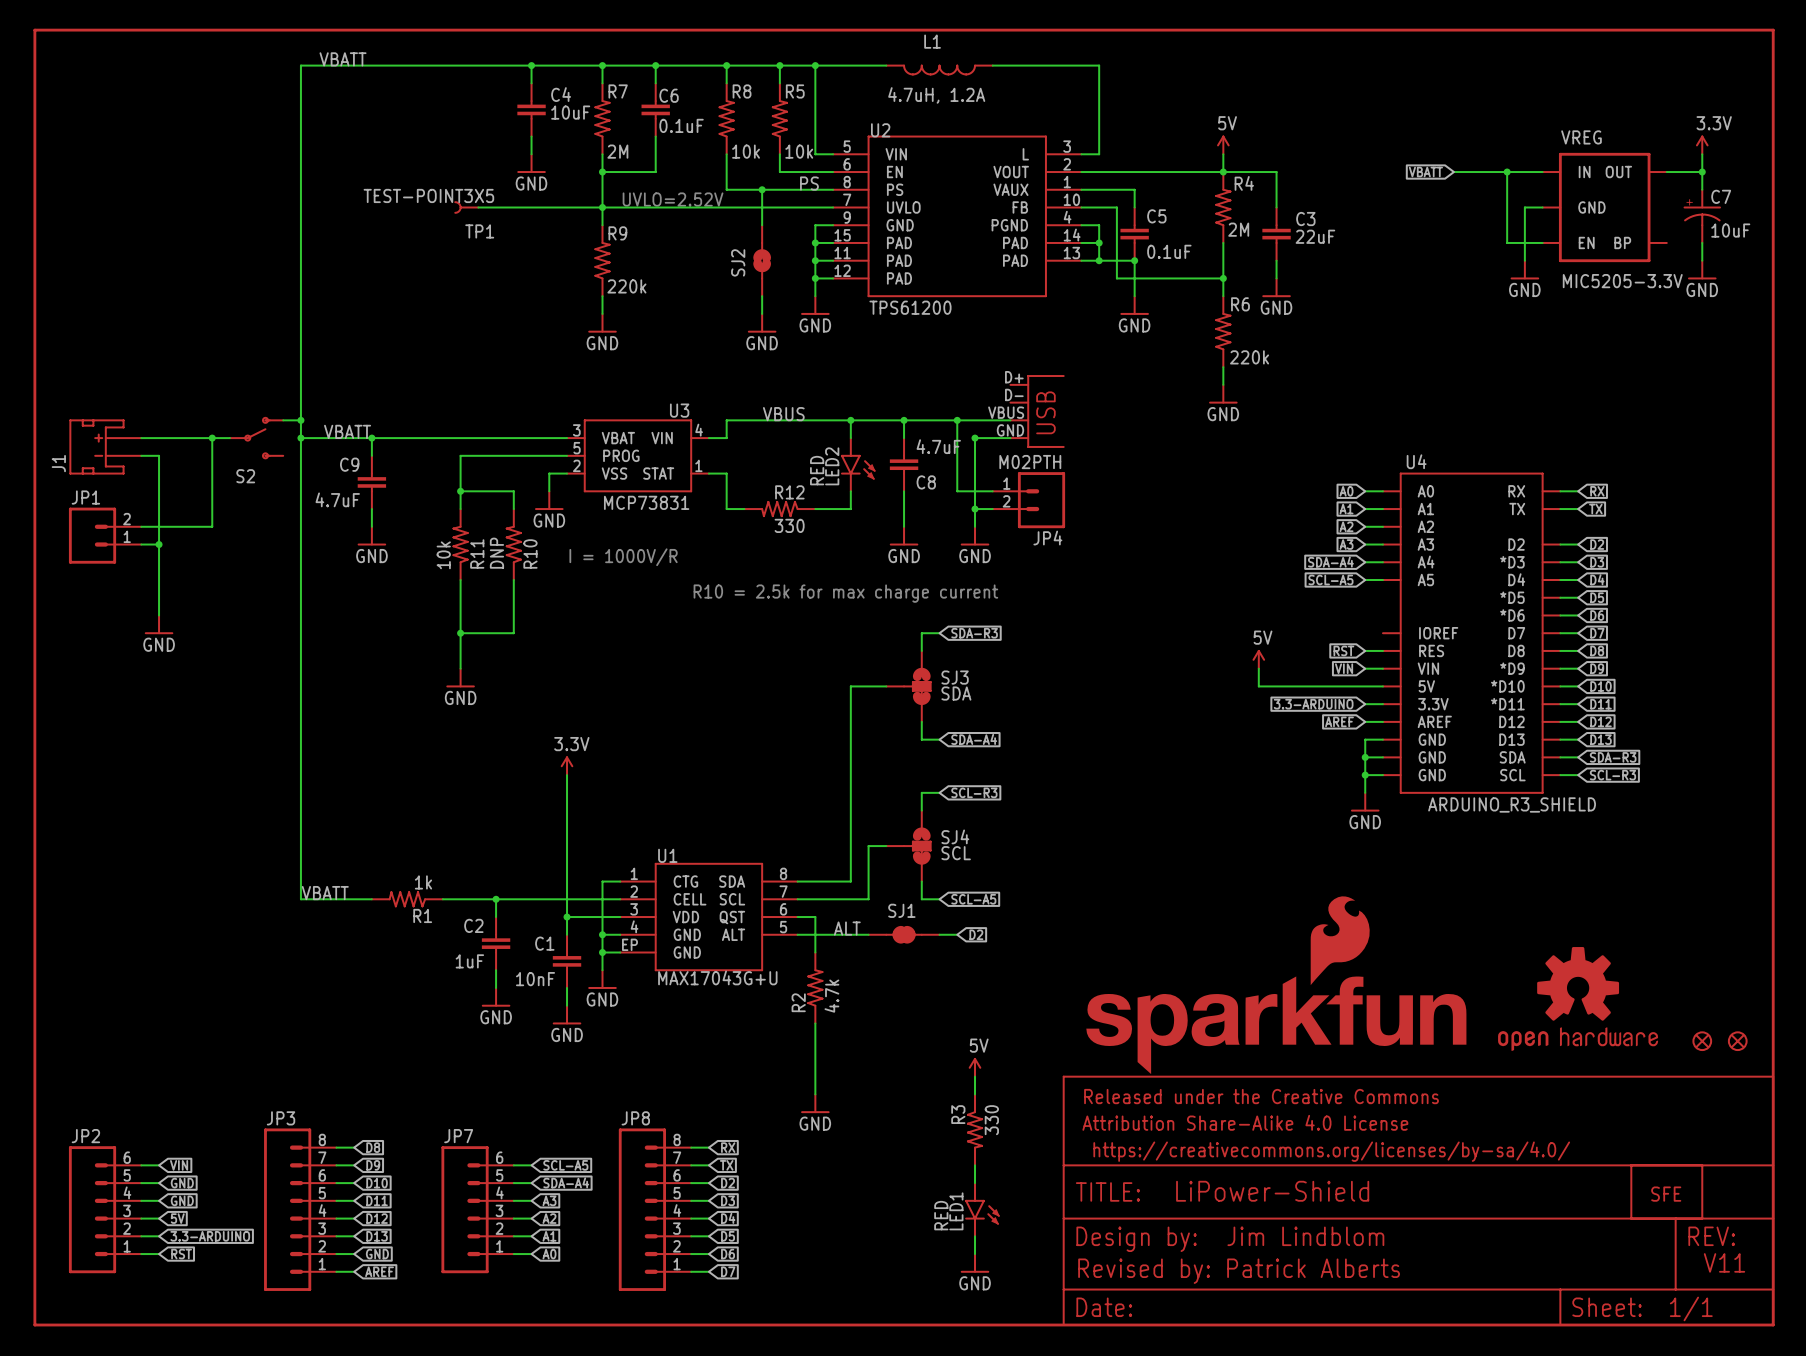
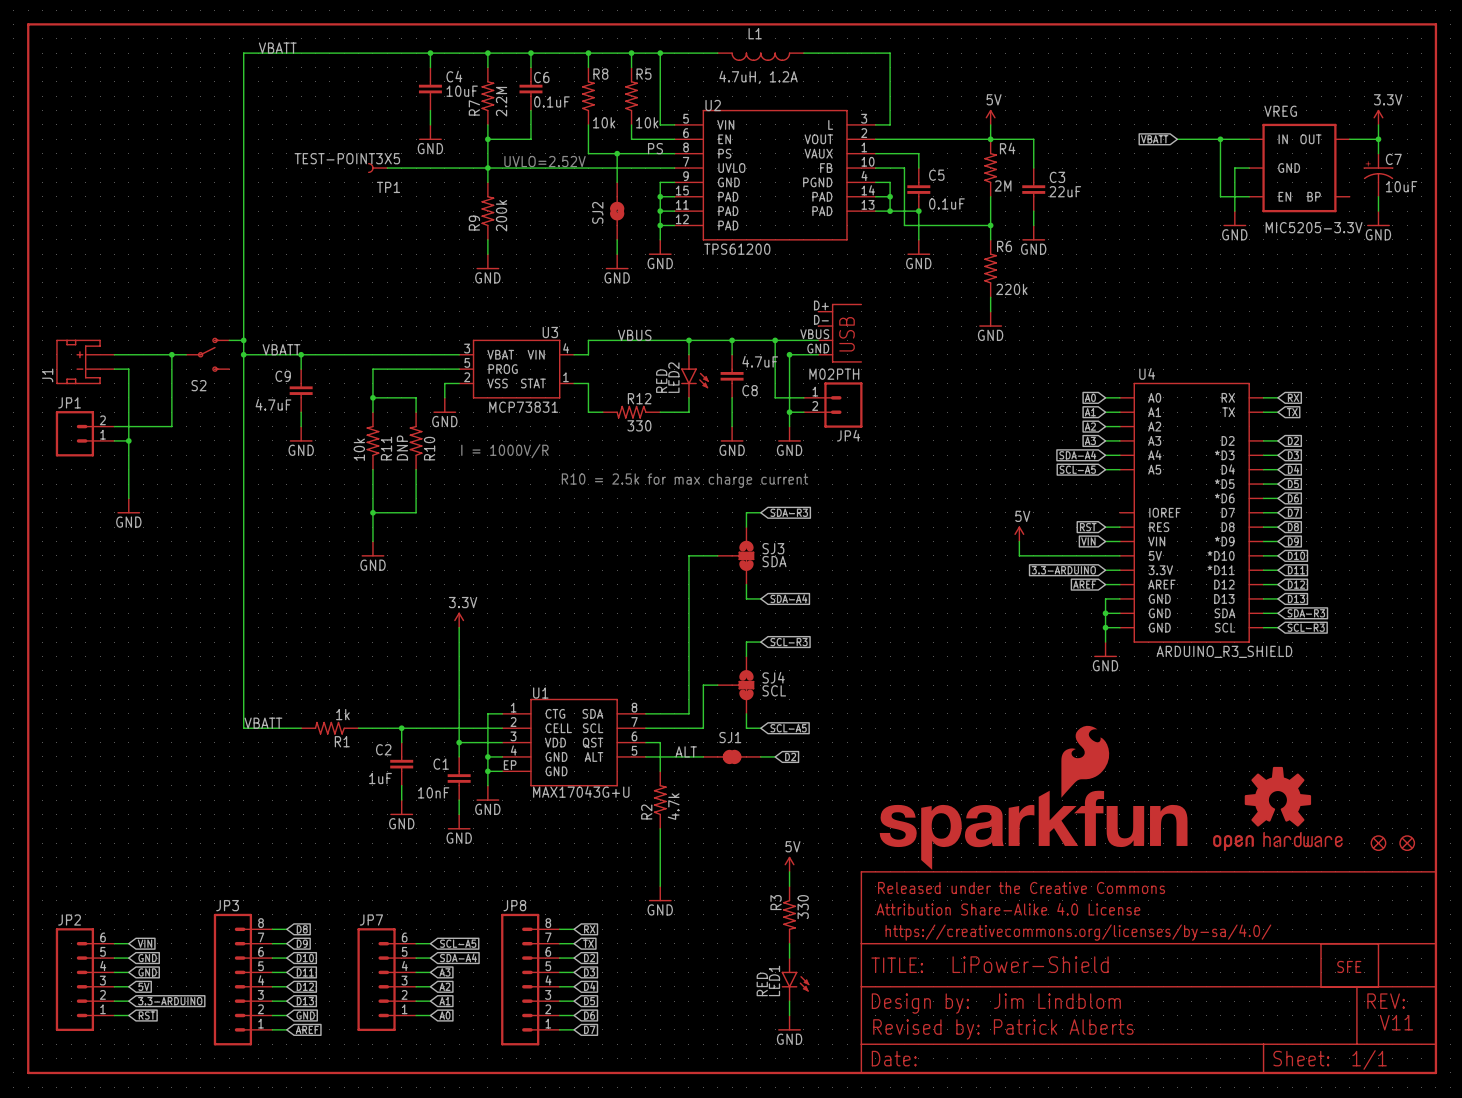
R7 name rotation: 0° (618, 91) -> 90° counterclockwise (474, 107)
R7 name position: R7 (618, 91) -> R7 (474, 107)
R7 value: 2M (617, 151) -> 2.2M (501, 101)
R9 name rotation: 0° (617, 233) -> 90° counterclockwise (474, 223)
R9 name position: R9 (617, 233) -> R9 (474, 223)
R9 value: 220k (626, 286) -> 200k (501, 215)

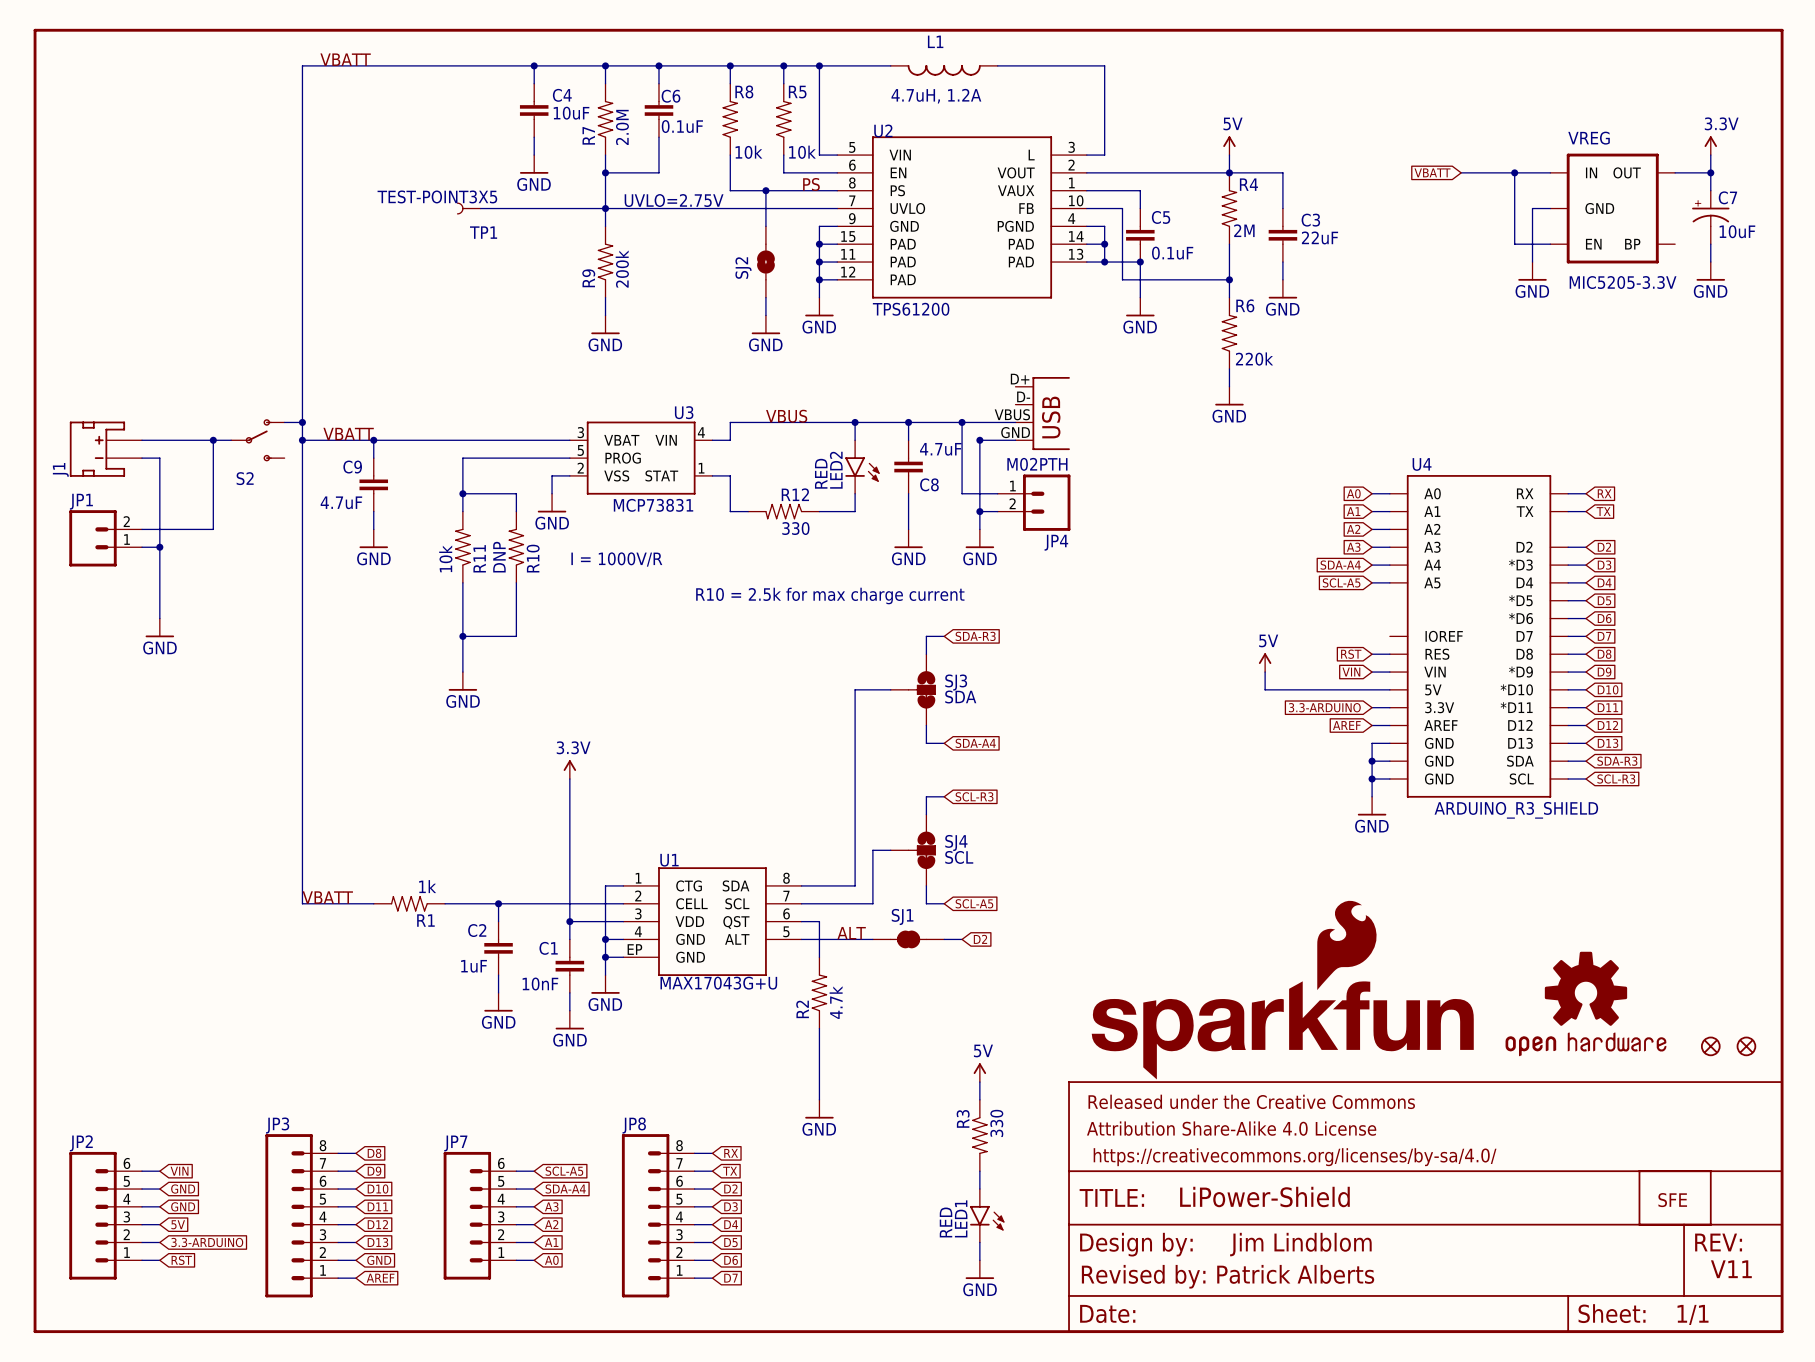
R7 value: 2.2M (501, 101) -> 2.0M (622, 127)
text: UVLO=2.52V (545, 161) -> UVLO=2.75V (674, 200)

